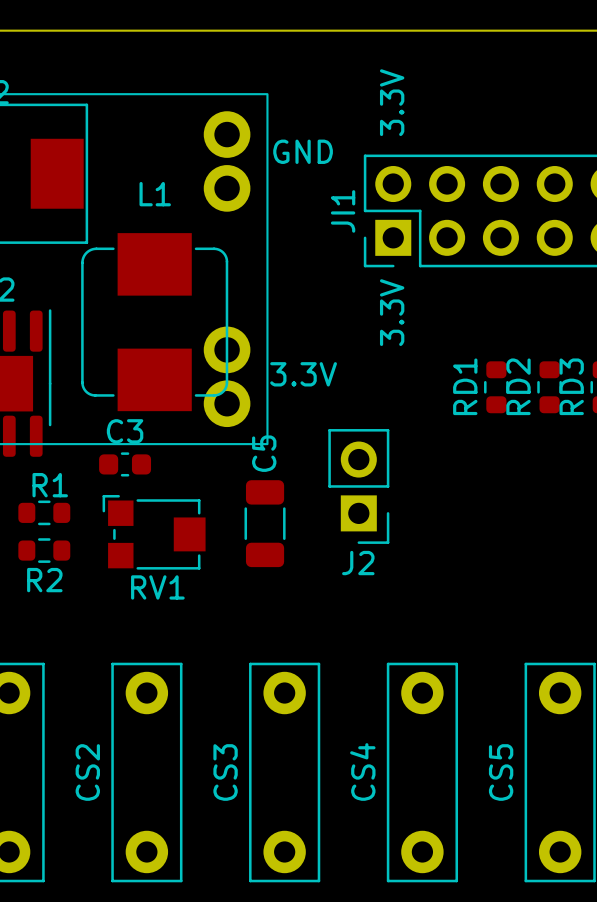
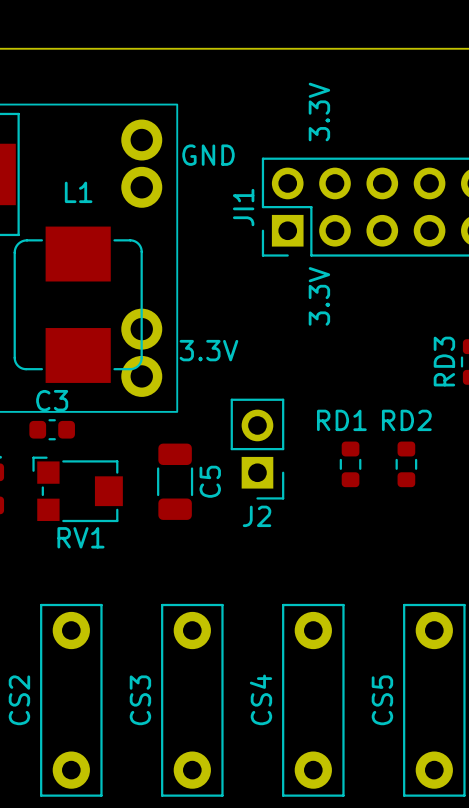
text position: 3.3V (392, 102) -> 3.3V (319, 112)
text position: 3.3V (392, 312) -> 3.3V (319, 296)
RD1 name rotation: 0° (465, 386) -> 90° clockwise (341, 420)
RD2 name rotation: 0° (518, 386) -> 90° clockwise (406, 420)
RD1 position: (496, 387) -> (350, 464)
RD2 position: (549, 387) -> (406, 464)
C5 name position: C5 (264, 453) -> C5 (210, 481)

